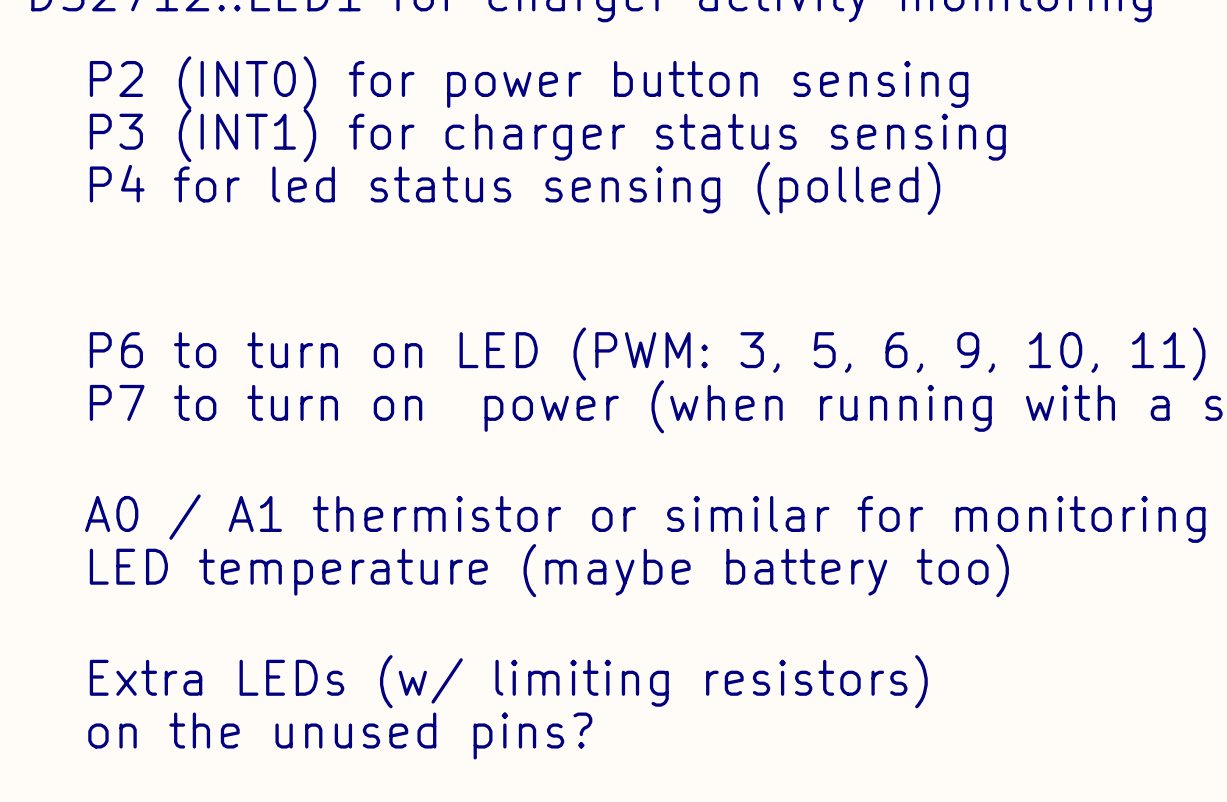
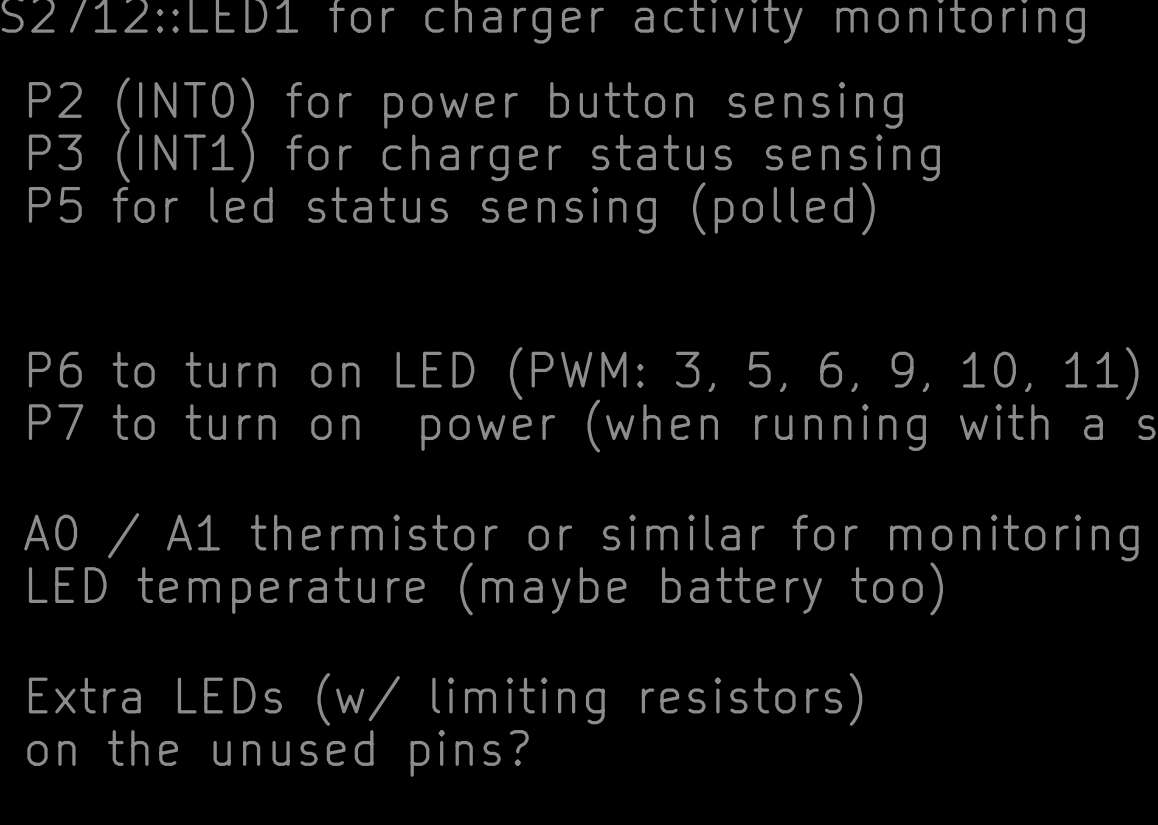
text: P4 for led status sensing (polled) (515, 188) -> P5 for led status sensing (polled) (451, 208)

